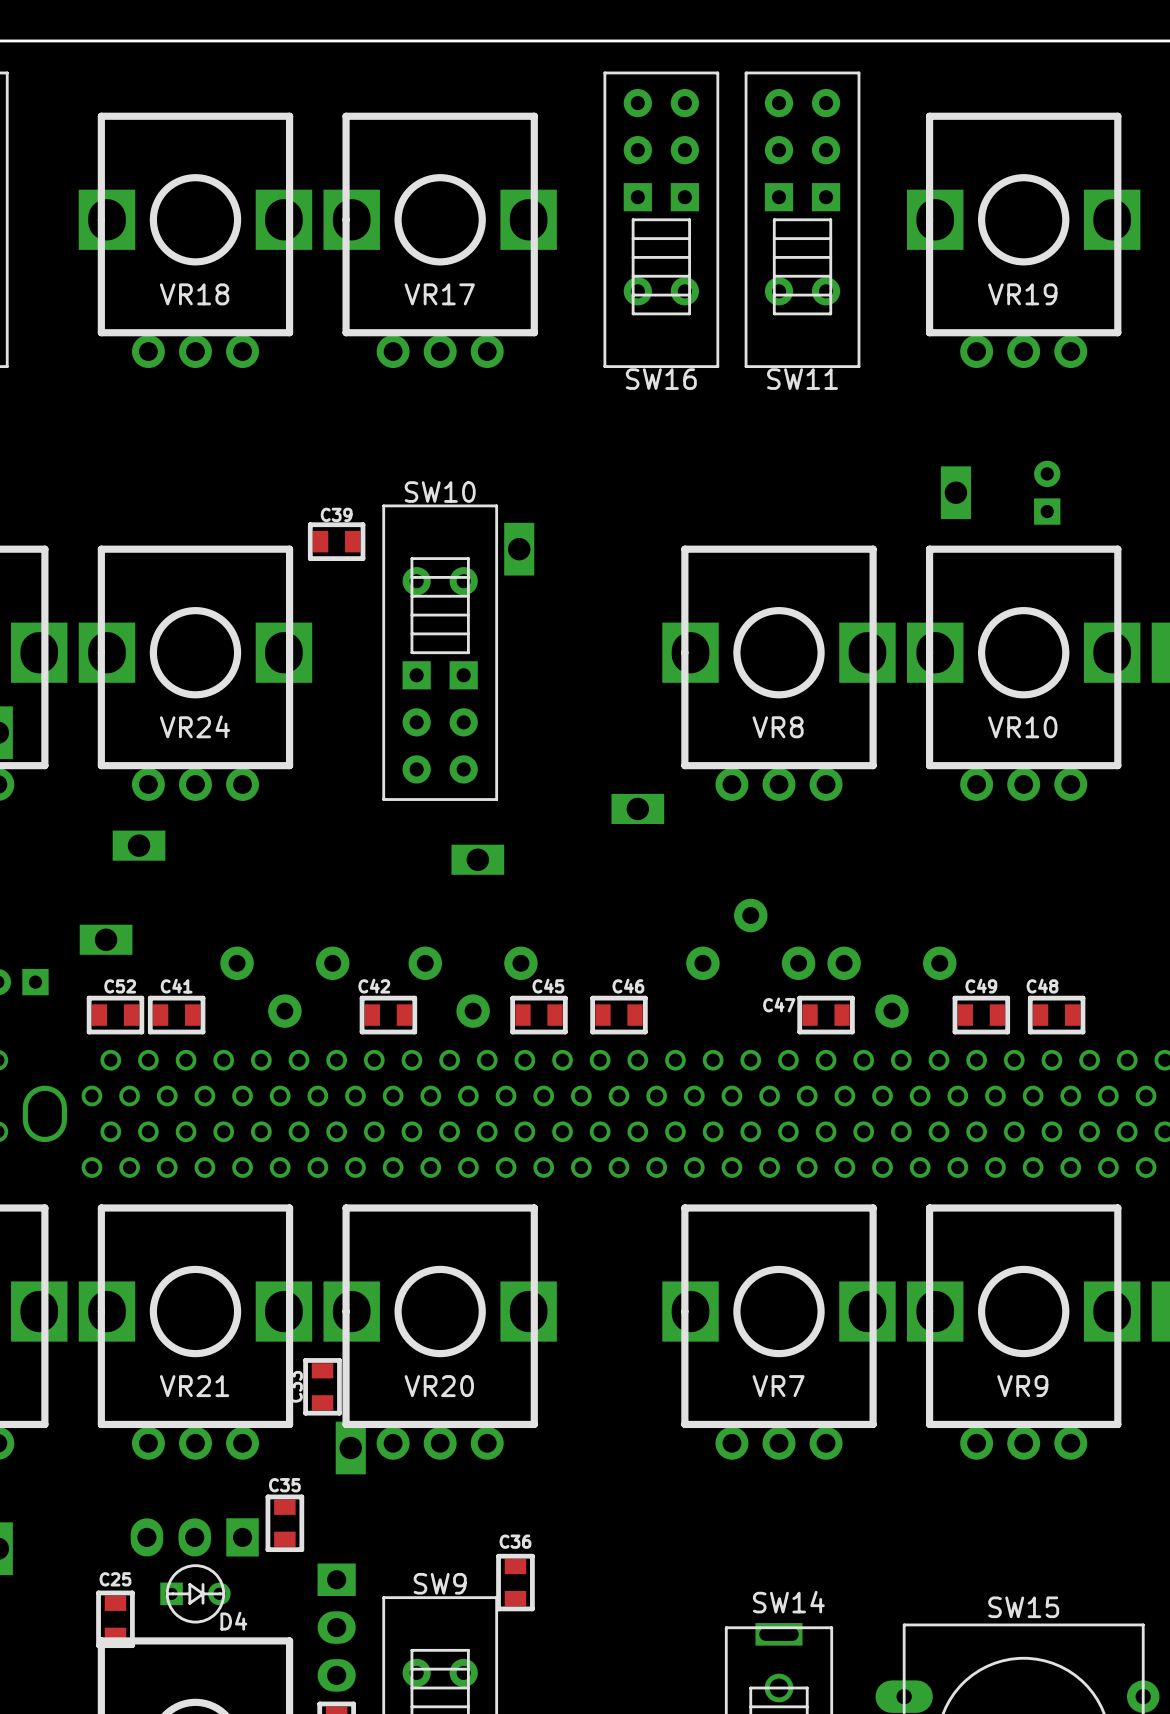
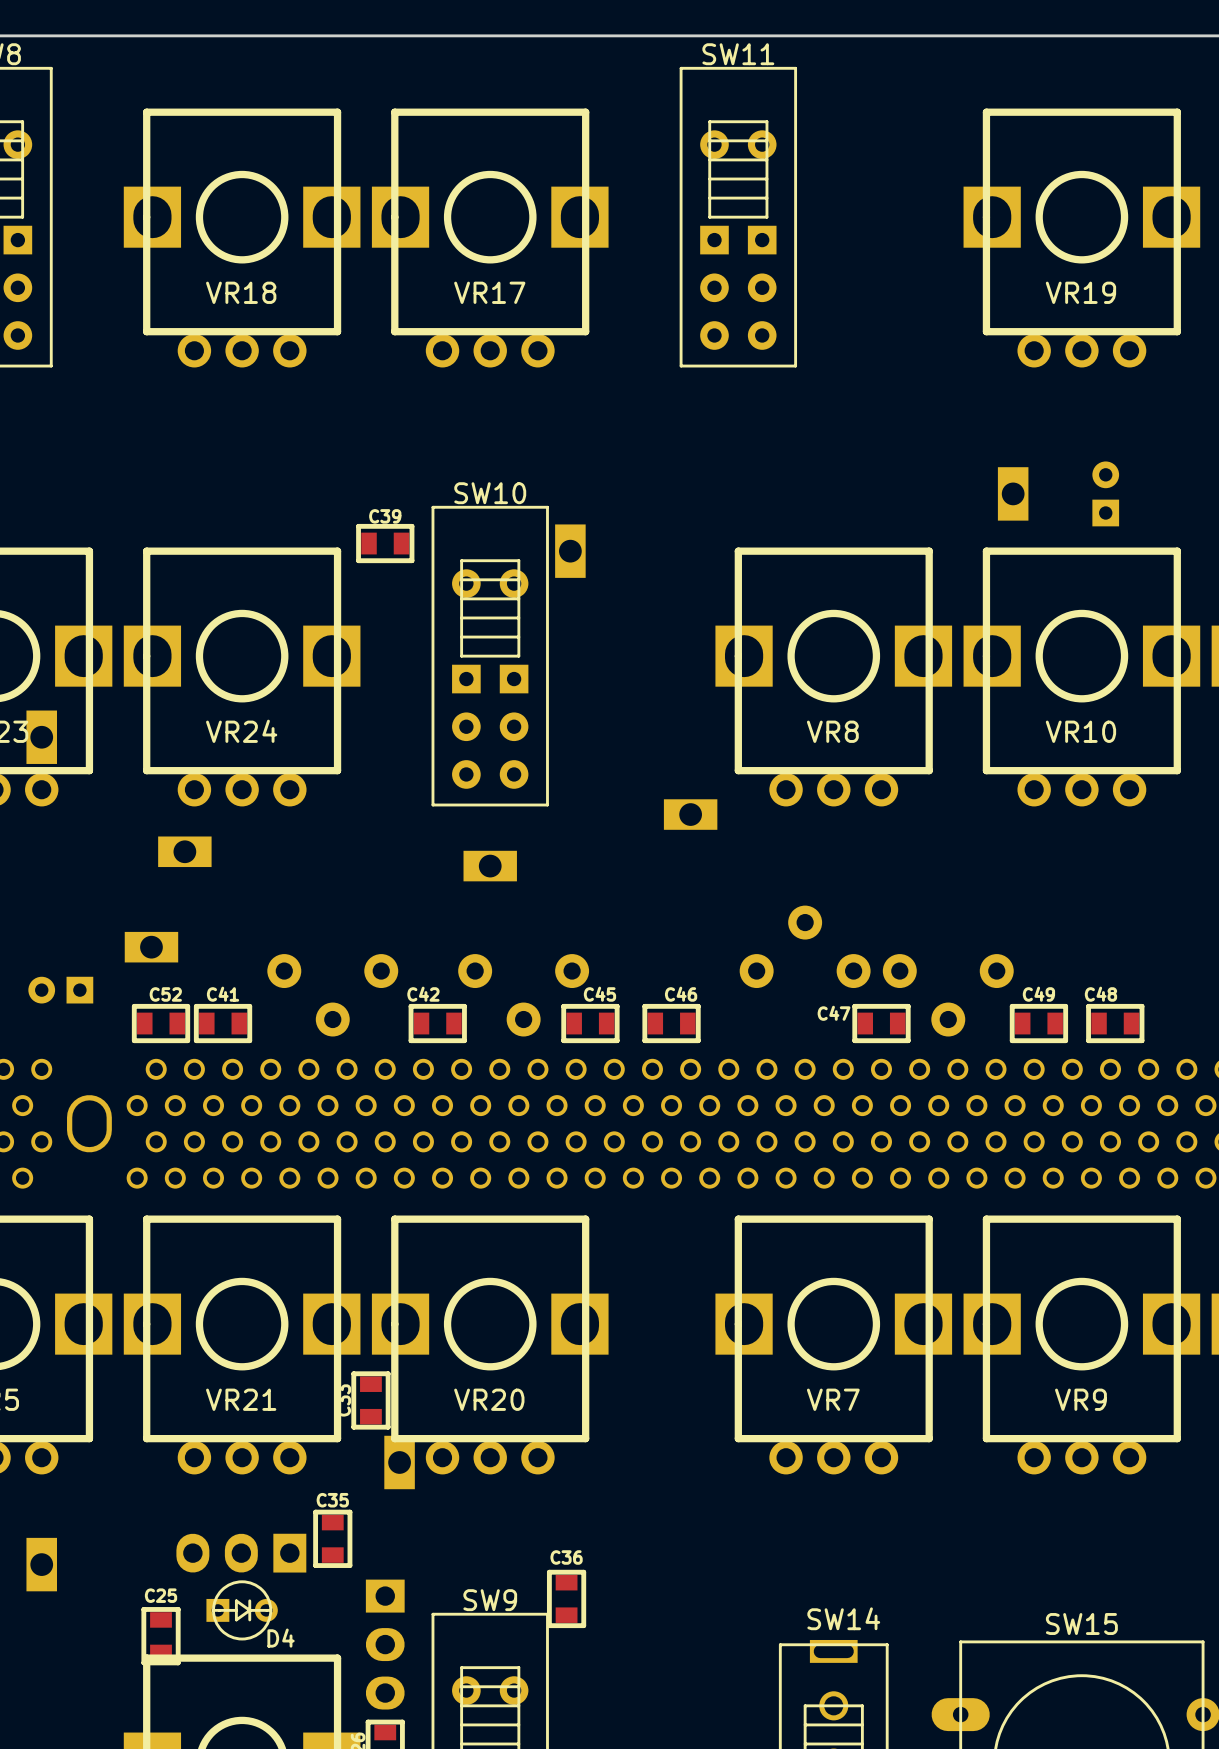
SW16: (661, 219) -> none
SW11 rotation: 0° (802, 219) -> 180° (738, 217)
part position: (477, 859) -> (490, 866)

